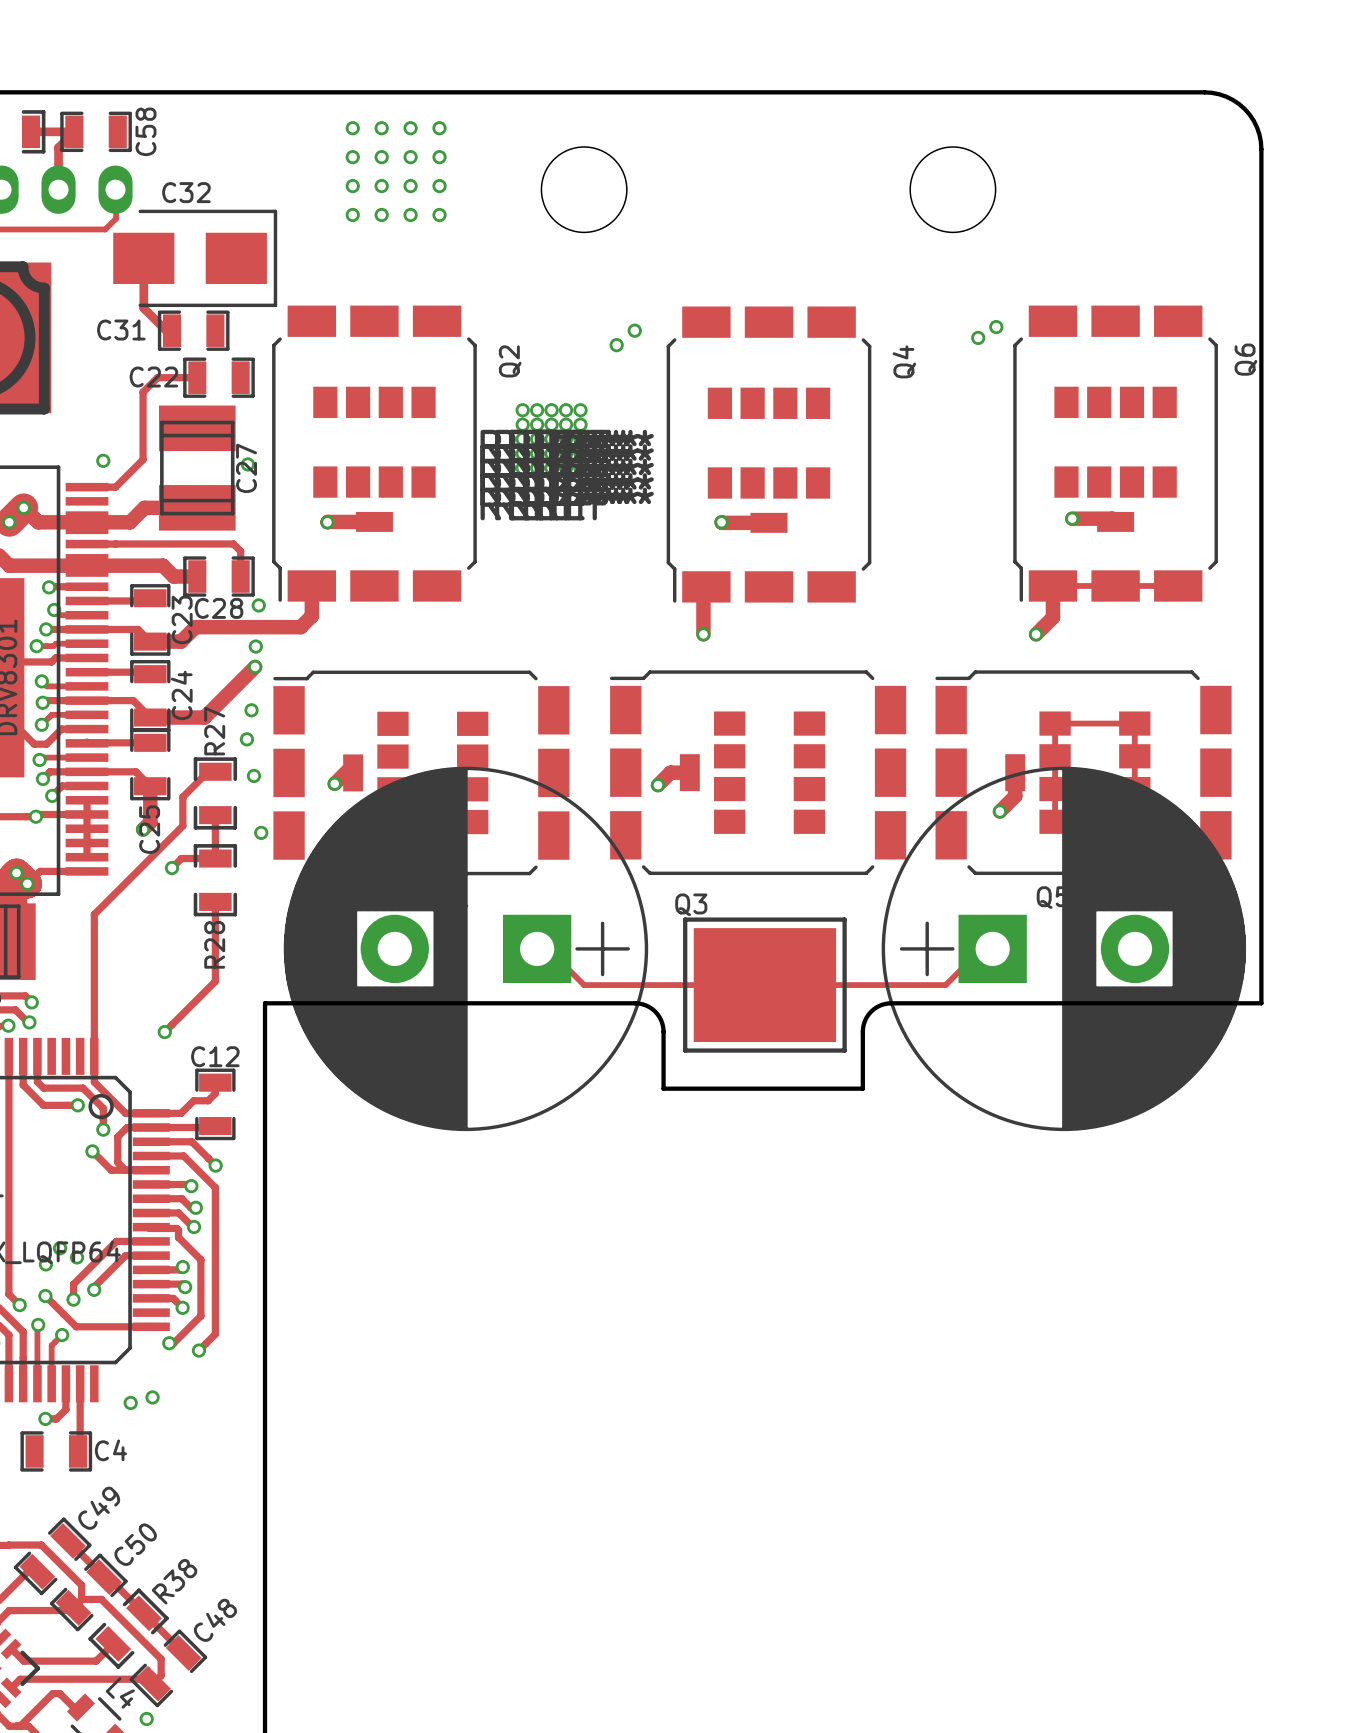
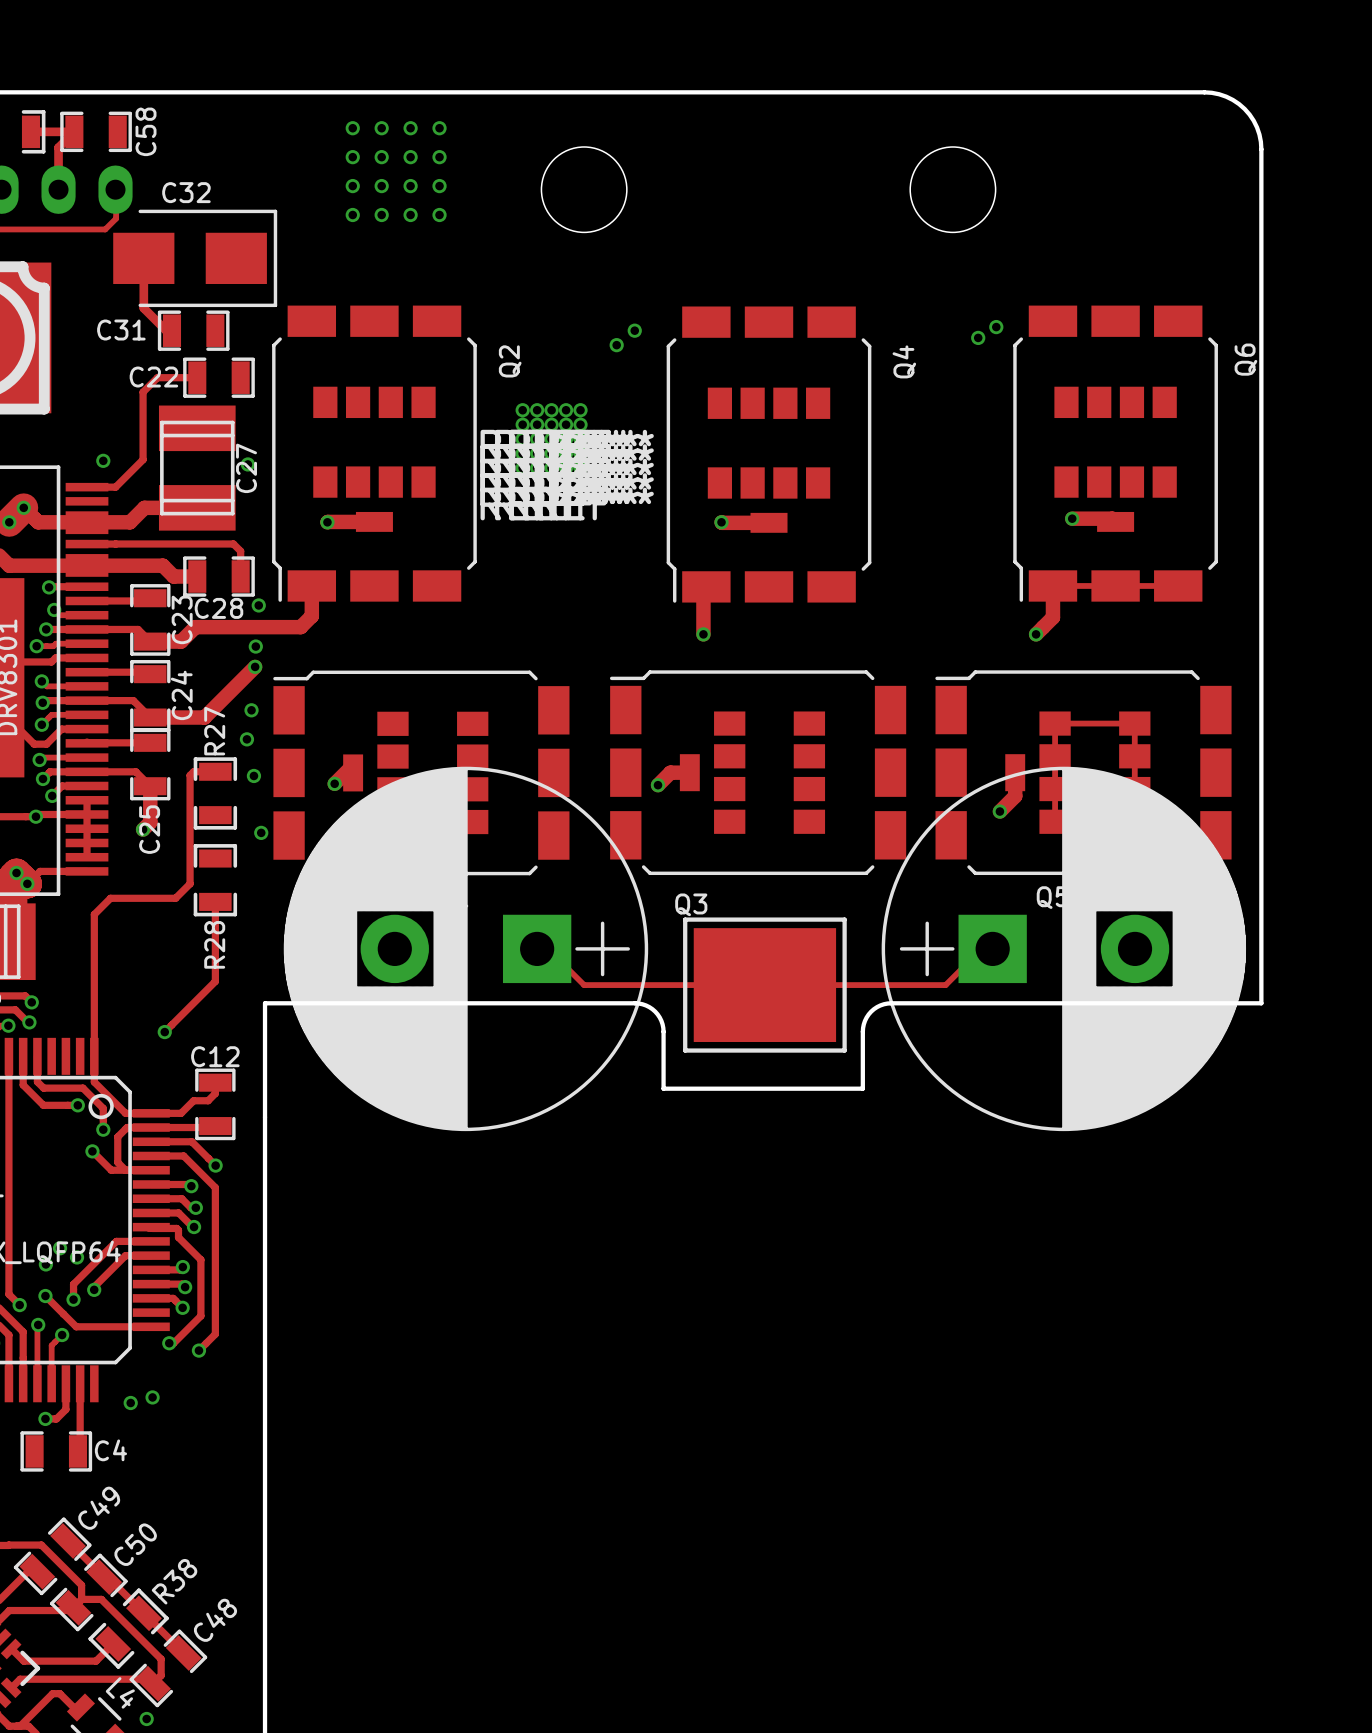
track: (208, 771) (182, 797) (182, 825) (110, 898) -> (208, 771) (193, 771) (190, 775) (190, 883) (175, 898) (110, 898)
track: (215, 815) (215, 858) (181, 858) (171, 868) -> none
via: (171, 868) -> none

